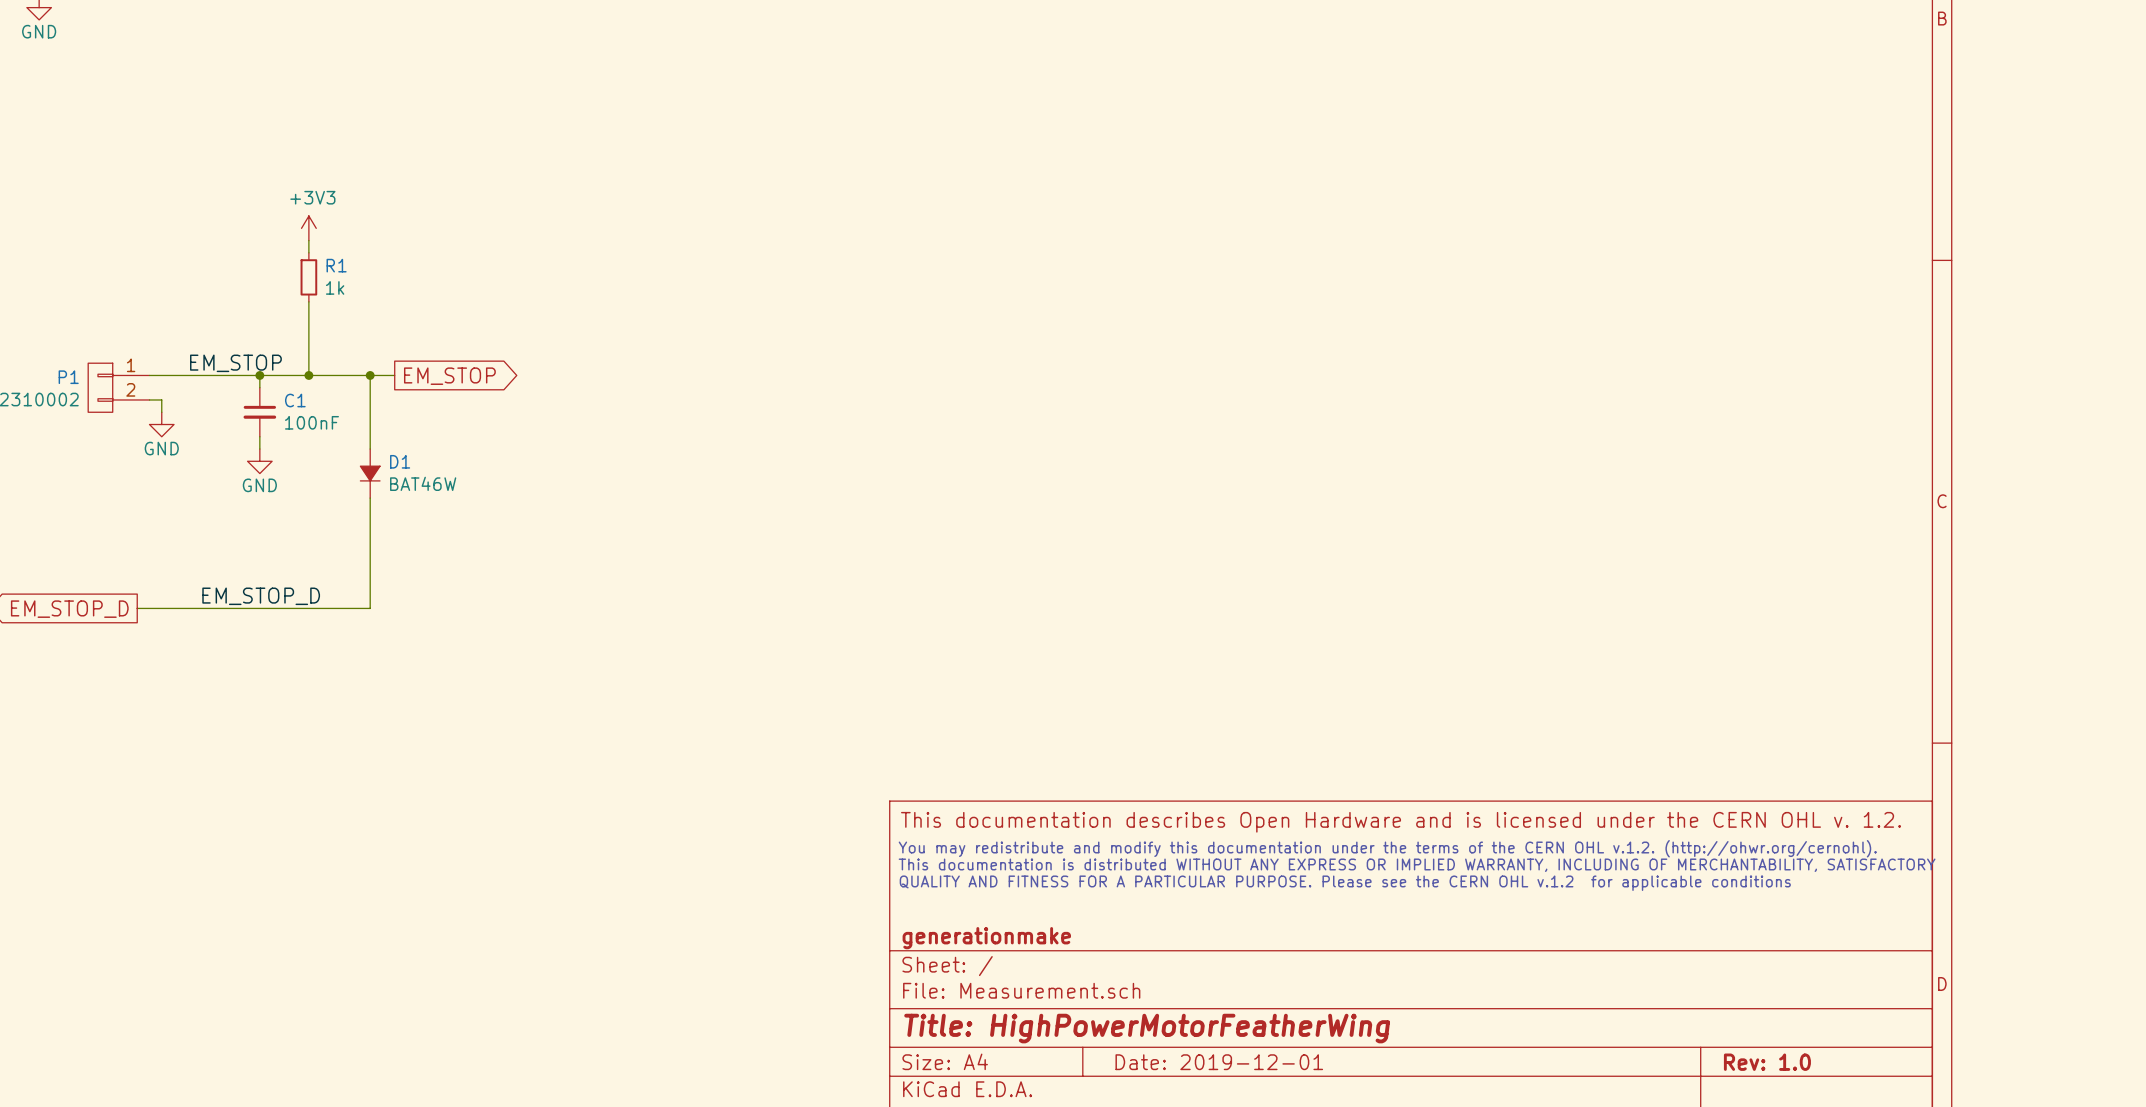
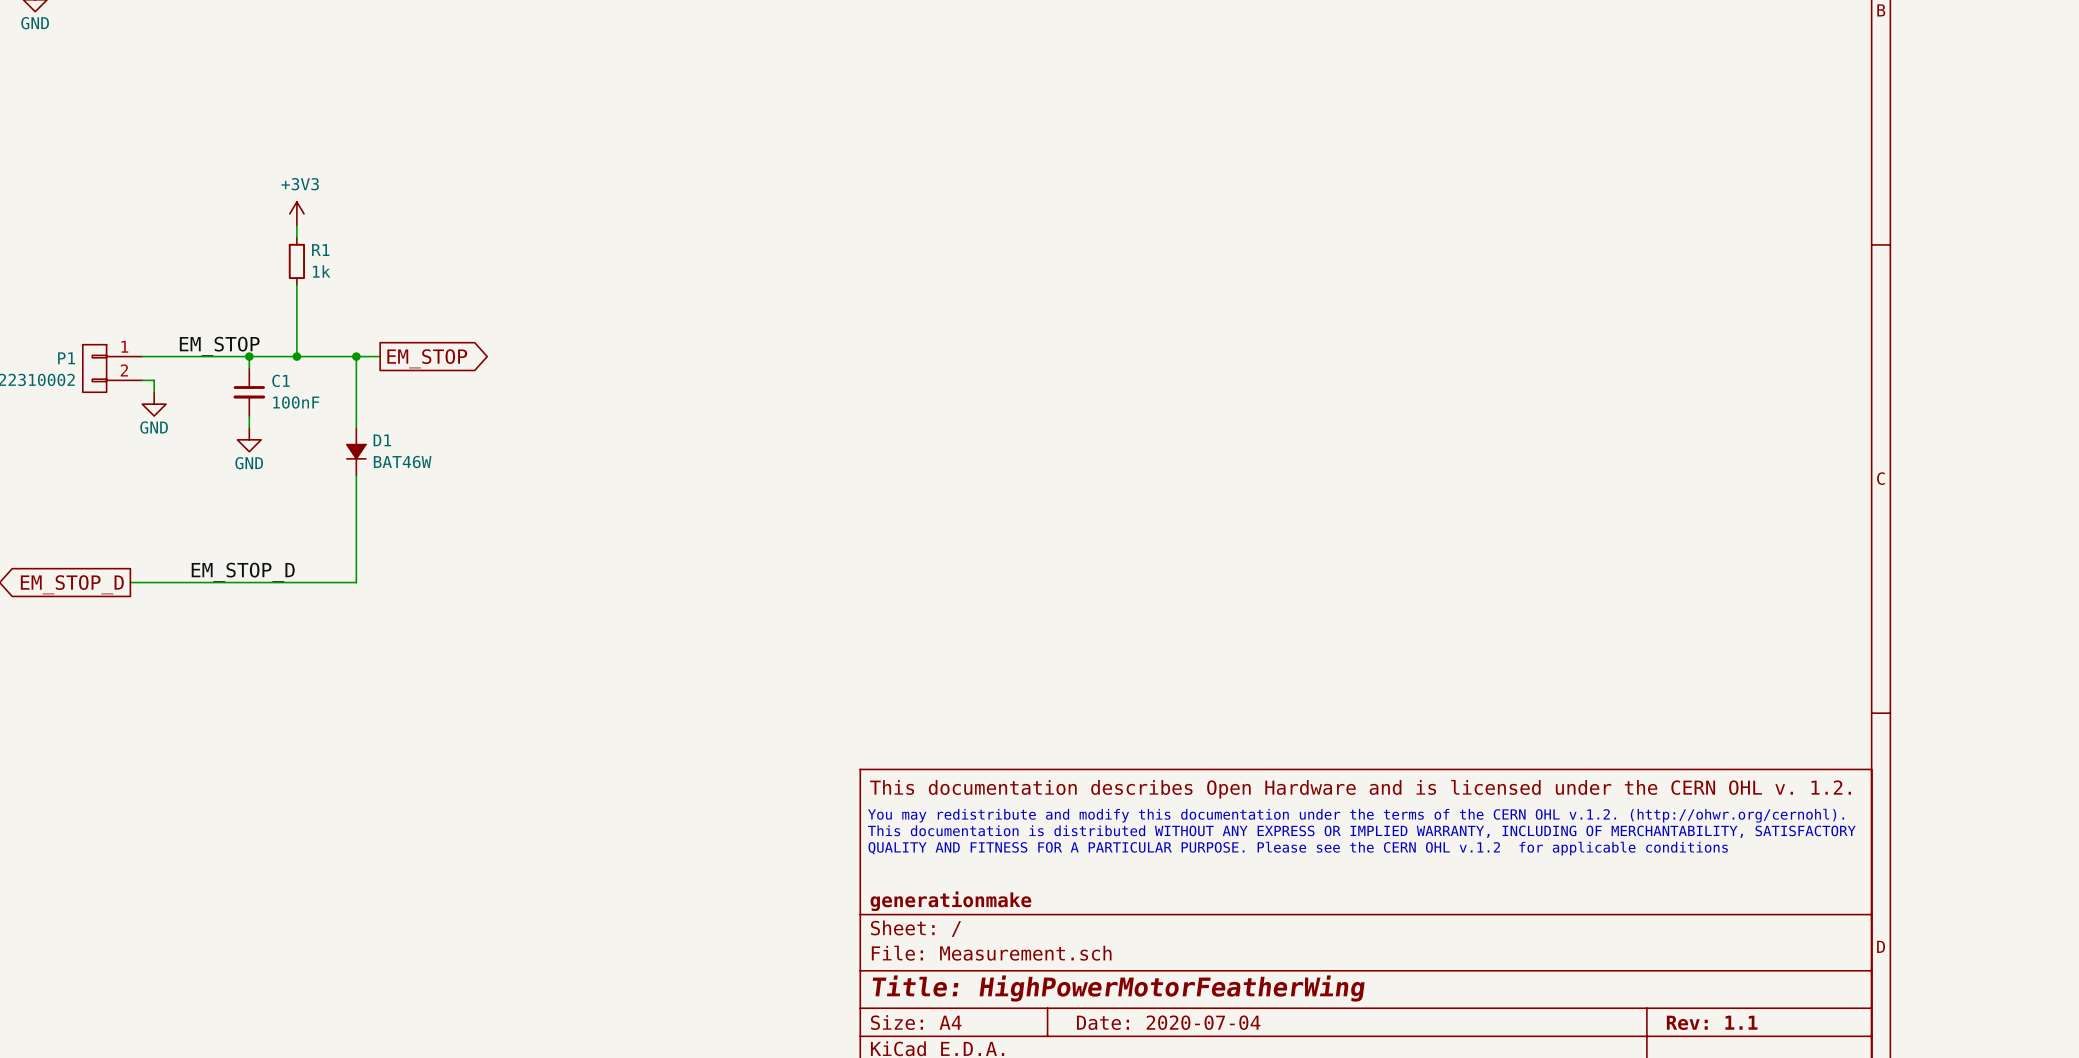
title block: Date: 2019-12-01 (1219, 1062) -> Date: 2020-07-04 (1168, 1022)
title block: Rev: 1.0 (1767, 1062) -> Rev: 1.1 (1712, 1022)

